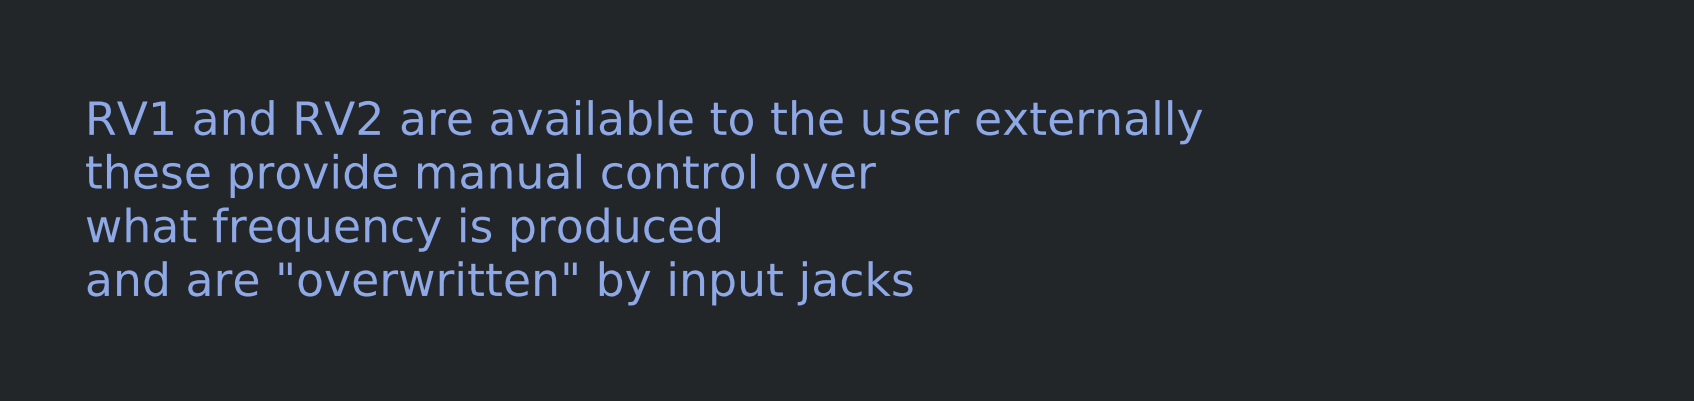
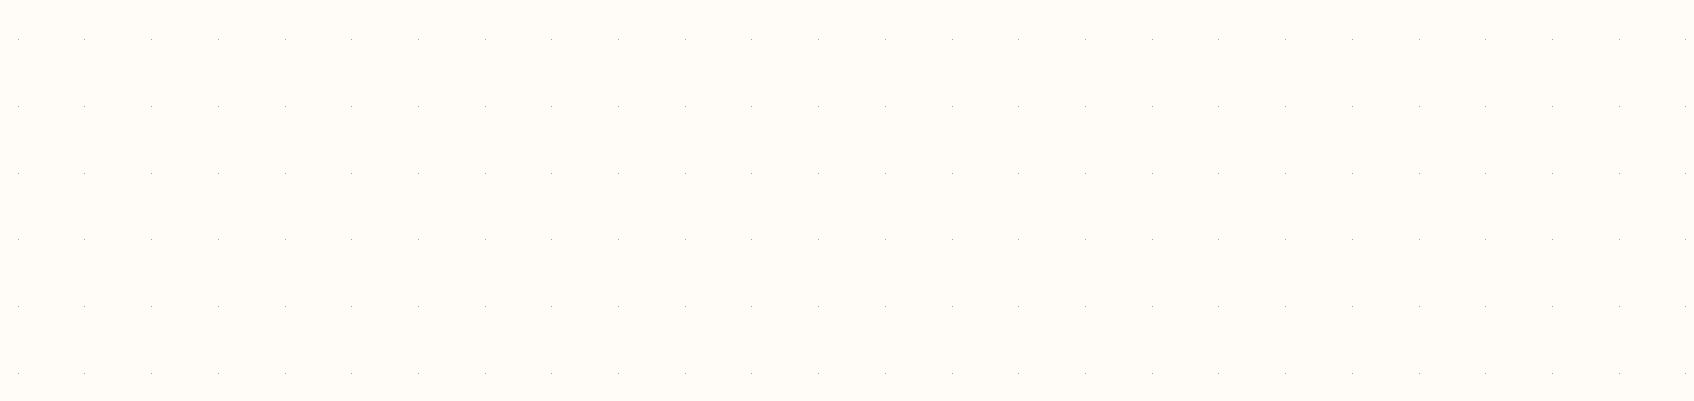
text: RV1 and RV2 are available to the user externally (645, 122) -> none
text: these provide manual control over (481, 175) -> none
text: what frequency is produced (403, 229) -> none
text: and are "overwritten" by input jacks (500, 283) -> none

